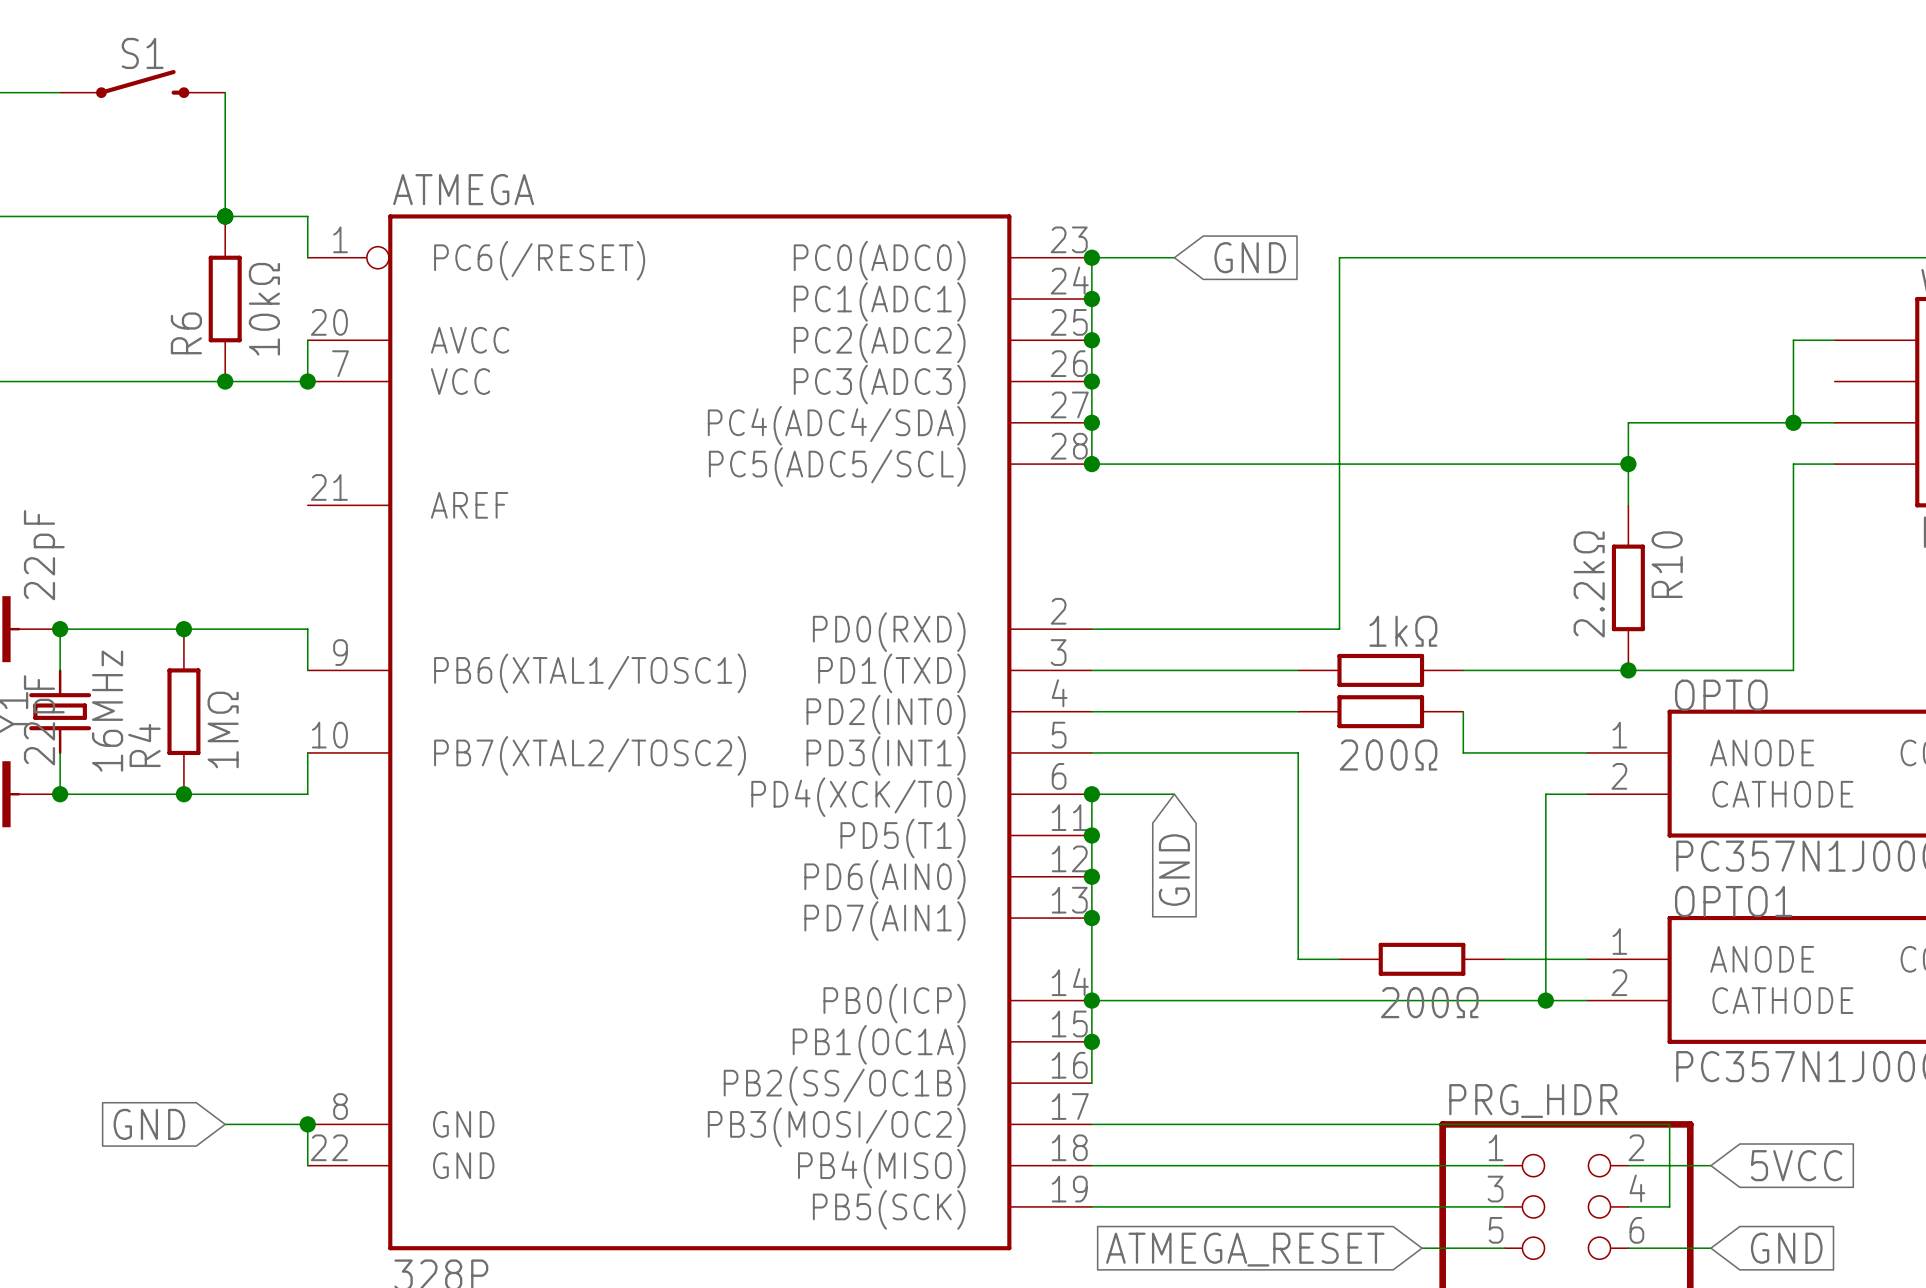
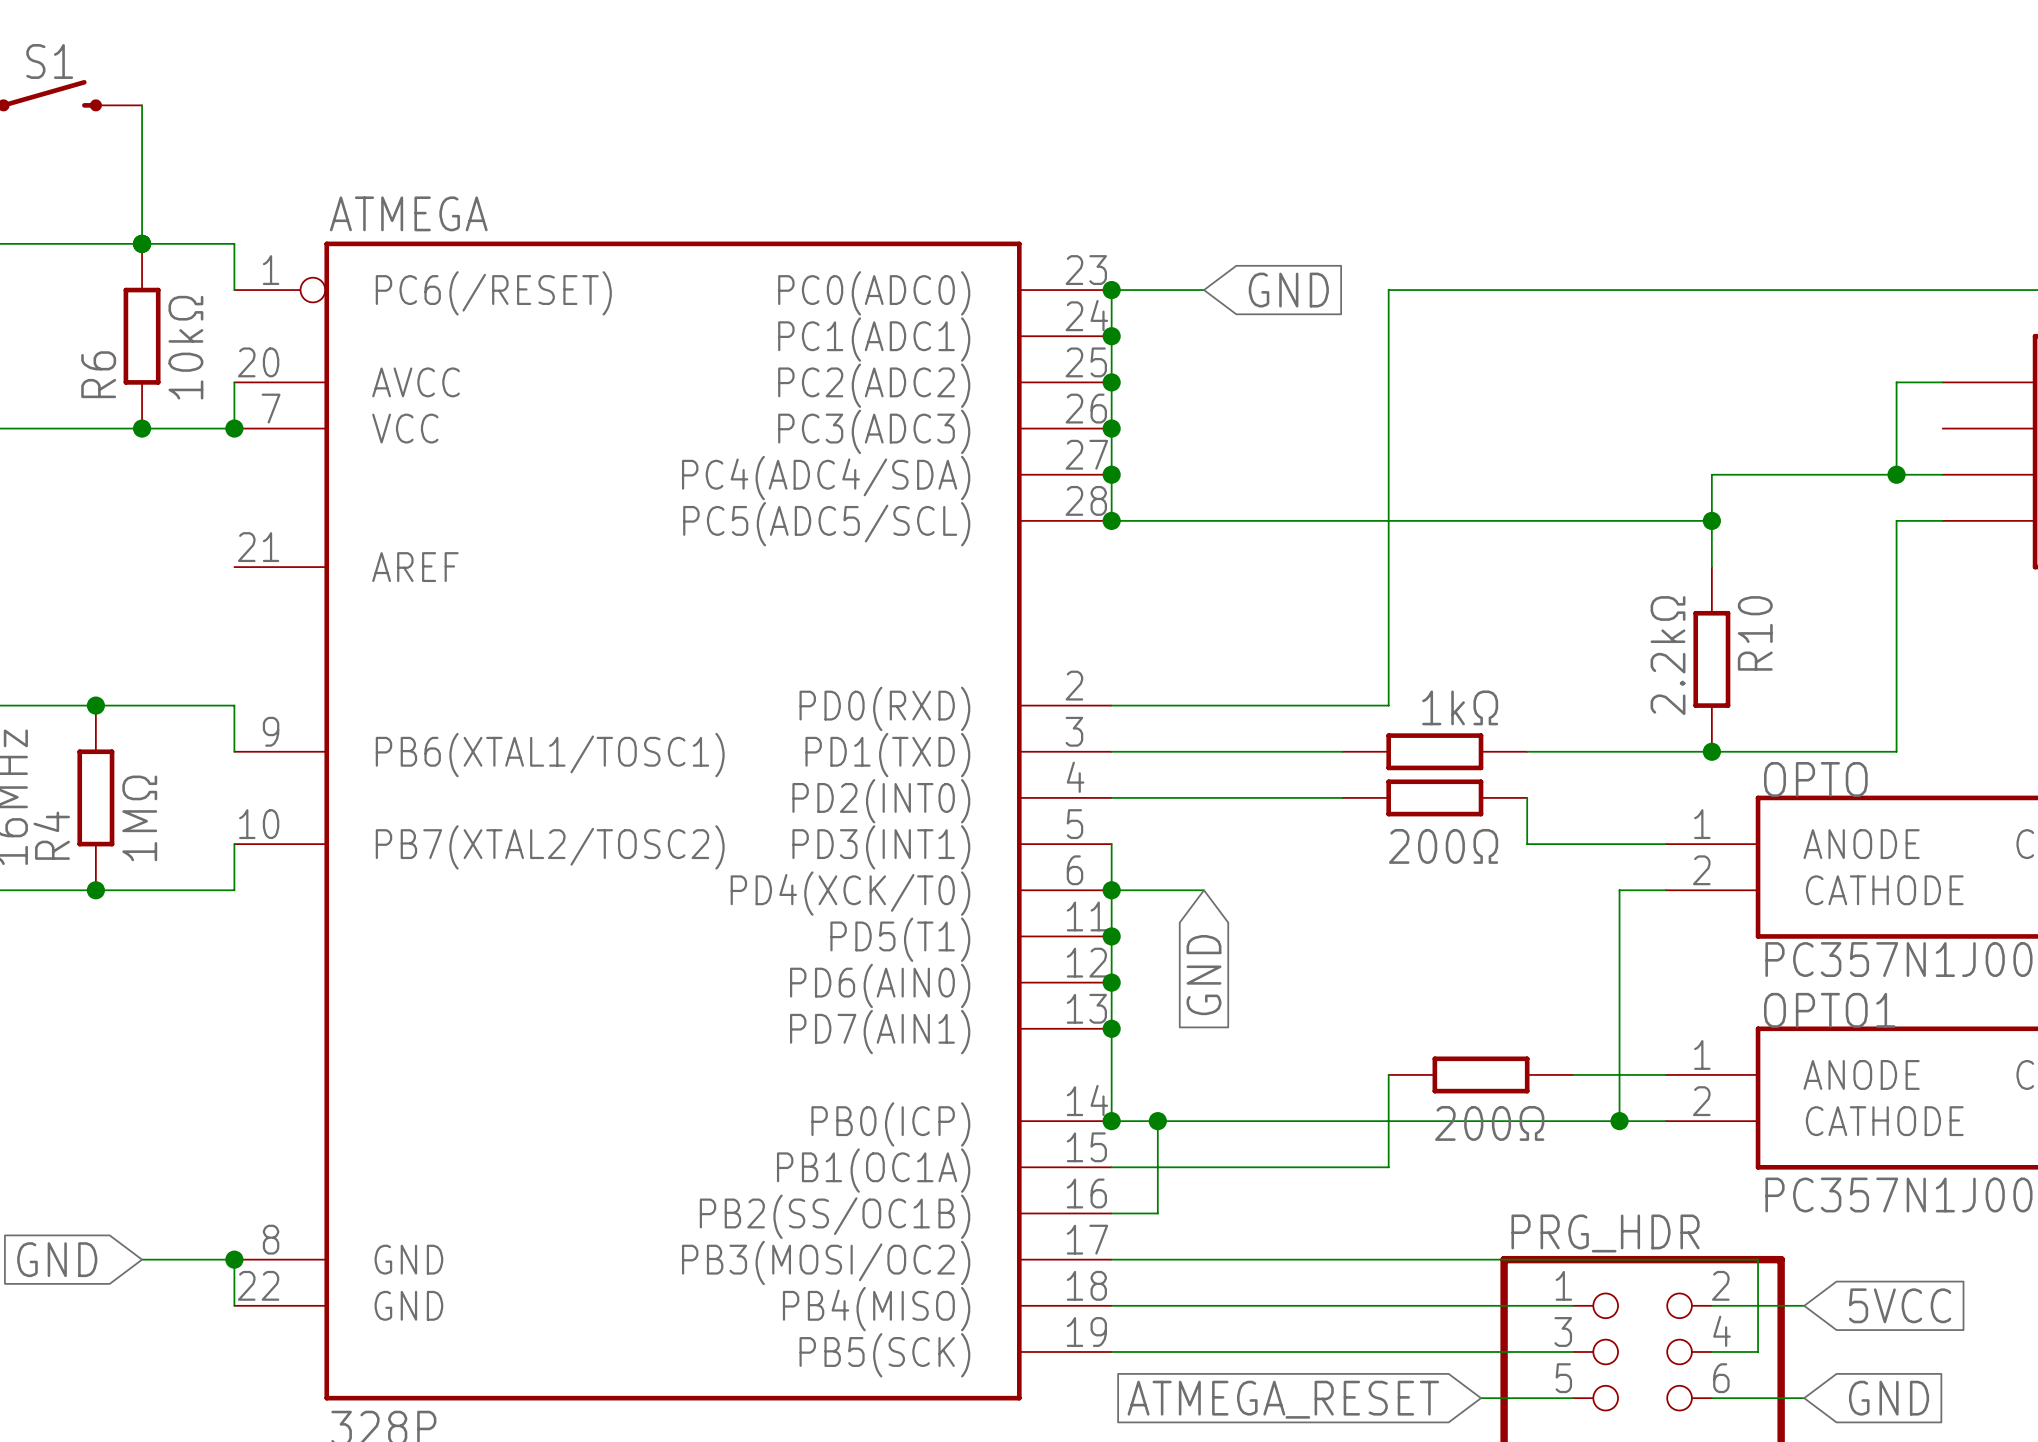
wire: (1091, 752) (1298, 752) (1298, 959) (1339, 959) -> (1111, 1167) (1388, 1167) (1388, 1074)
wire: none -> (1111, 844) (1111, 890)
wire: (1091, 1000) (1091, 1083) -> (1157, 1121) (1157, 1213) (1111, 1213)
junction position: (1091, 1041) -> (1157, 1121)

